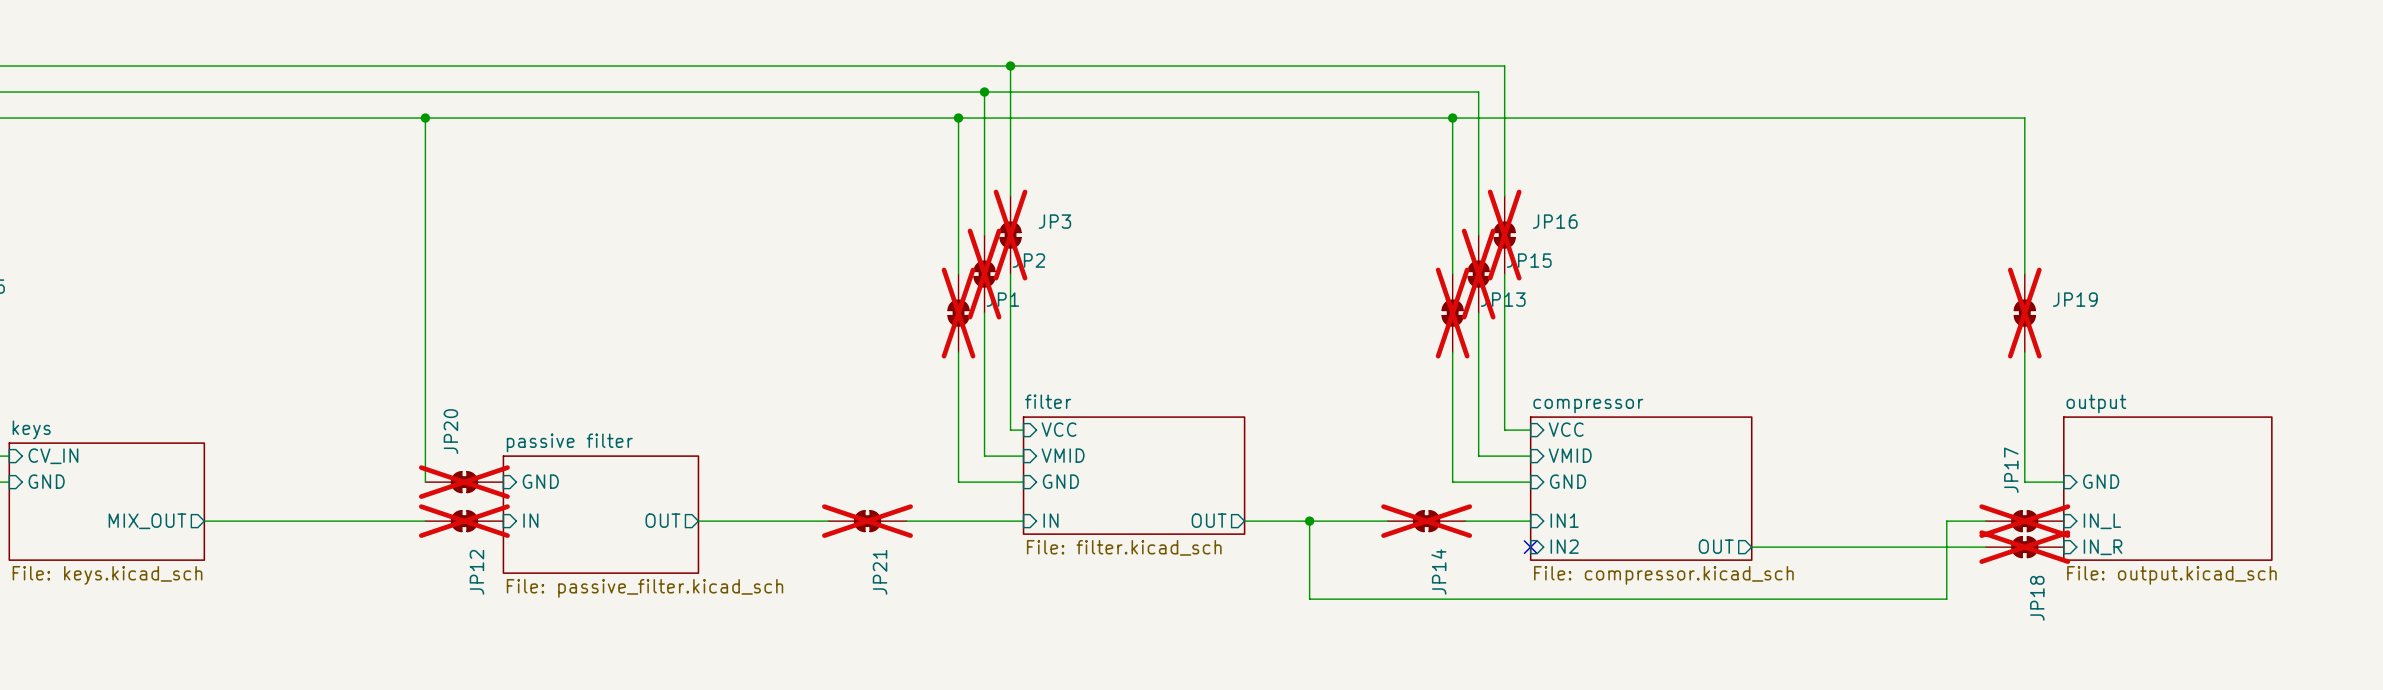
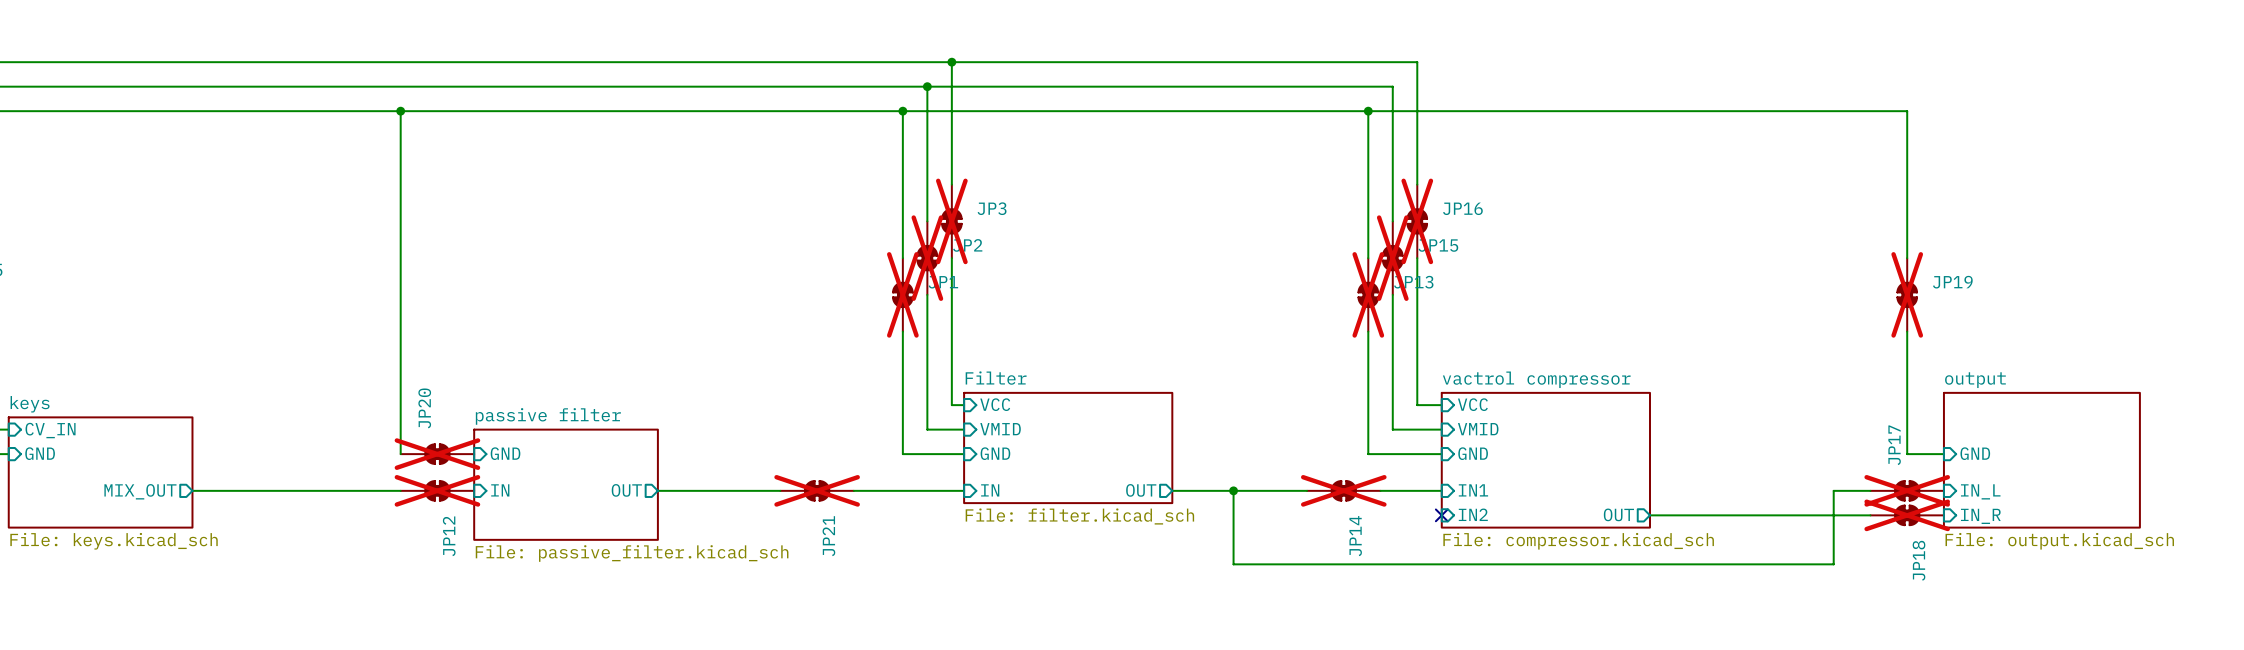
sheet filter name: filter (1048, 401) -> Filter (996, 378)
sheet compressor name: compressor (1588, 406) -> vactrol compressor (1536, 379)

